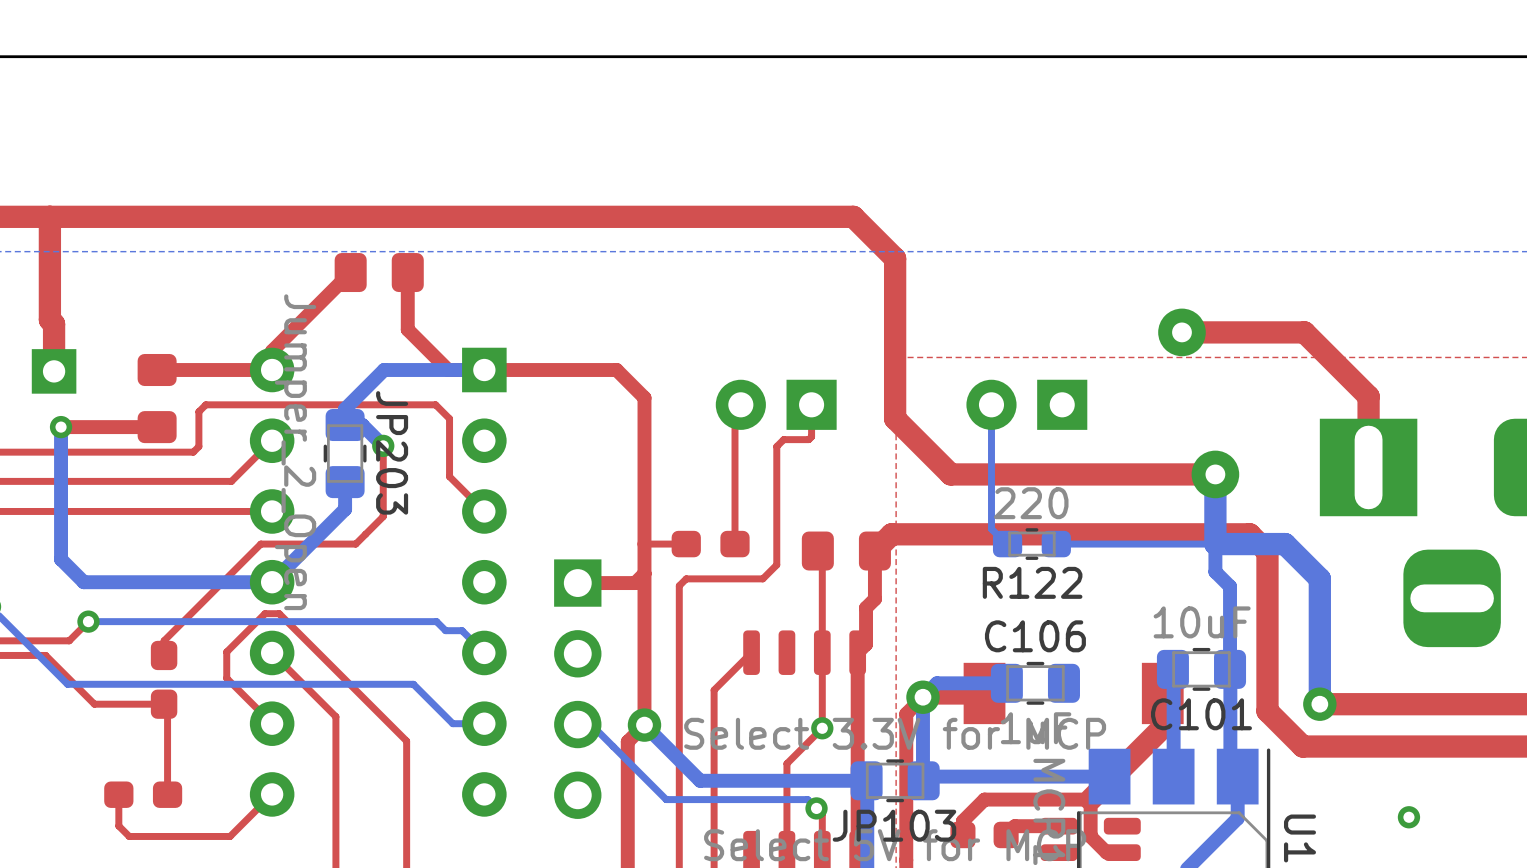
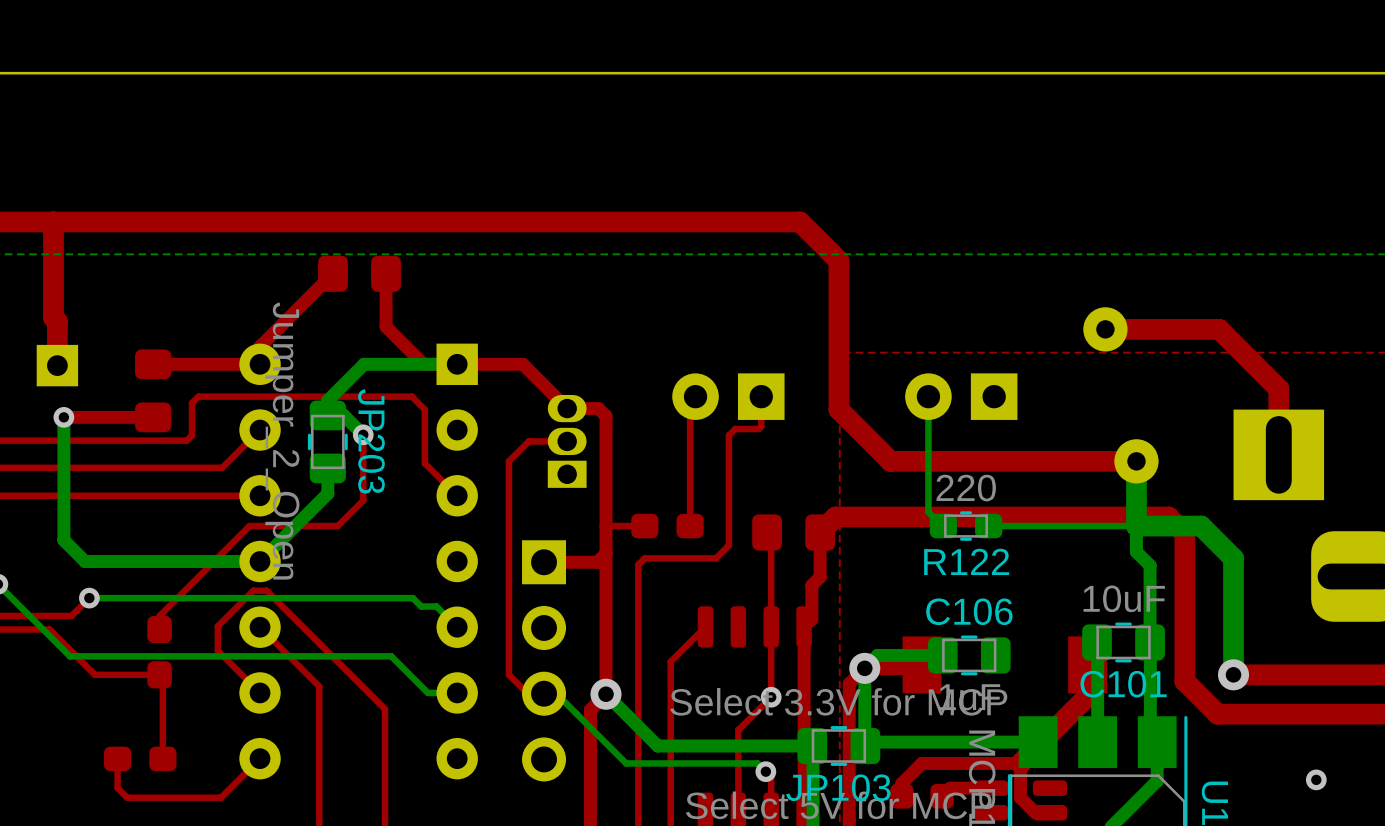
top track: (555, 370) (616, 370) (644, 397) (644, 425) -> (522, 364) (567, 408) (598, 408) (606, 416)
top track: none -> (567, 441) (528, 441) (508, 461) (508, 674) (527, 693) (544, 693)
part: none -> (567, 441)

